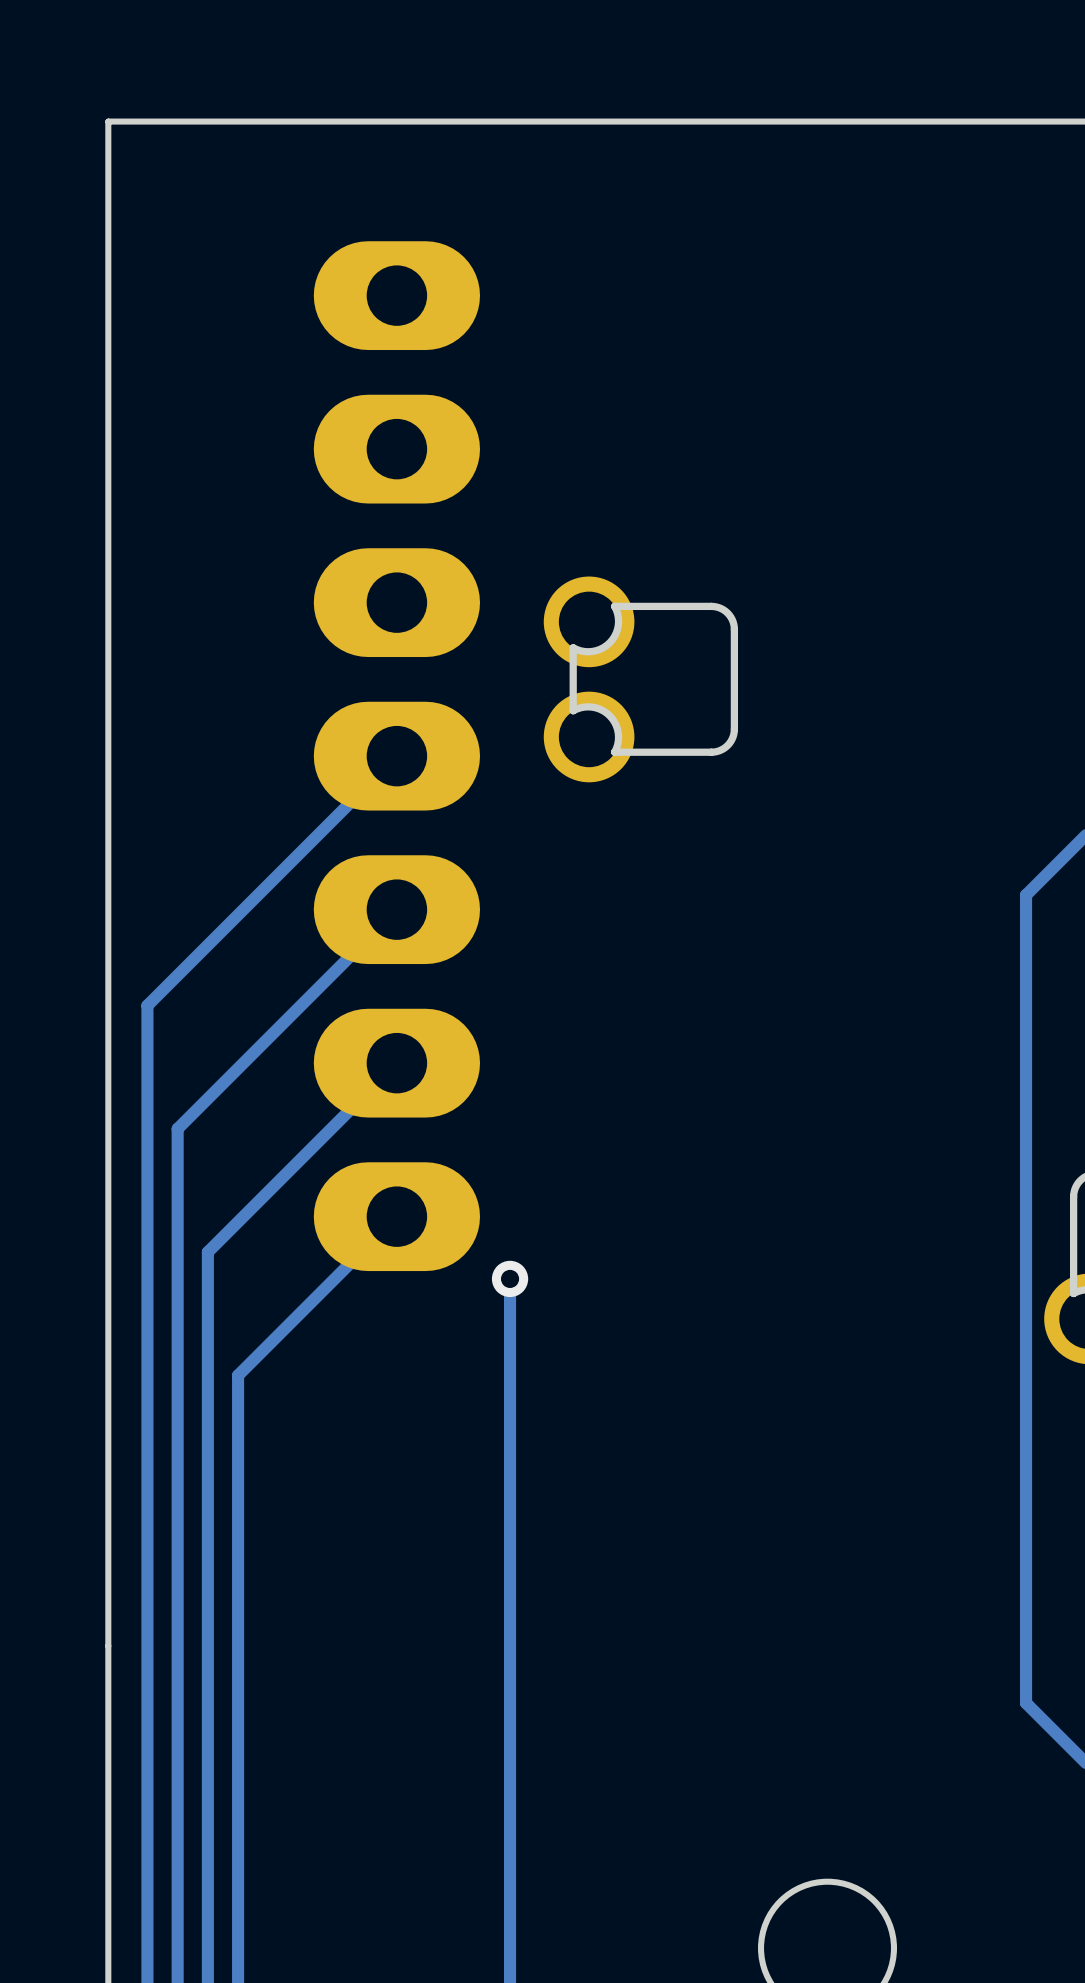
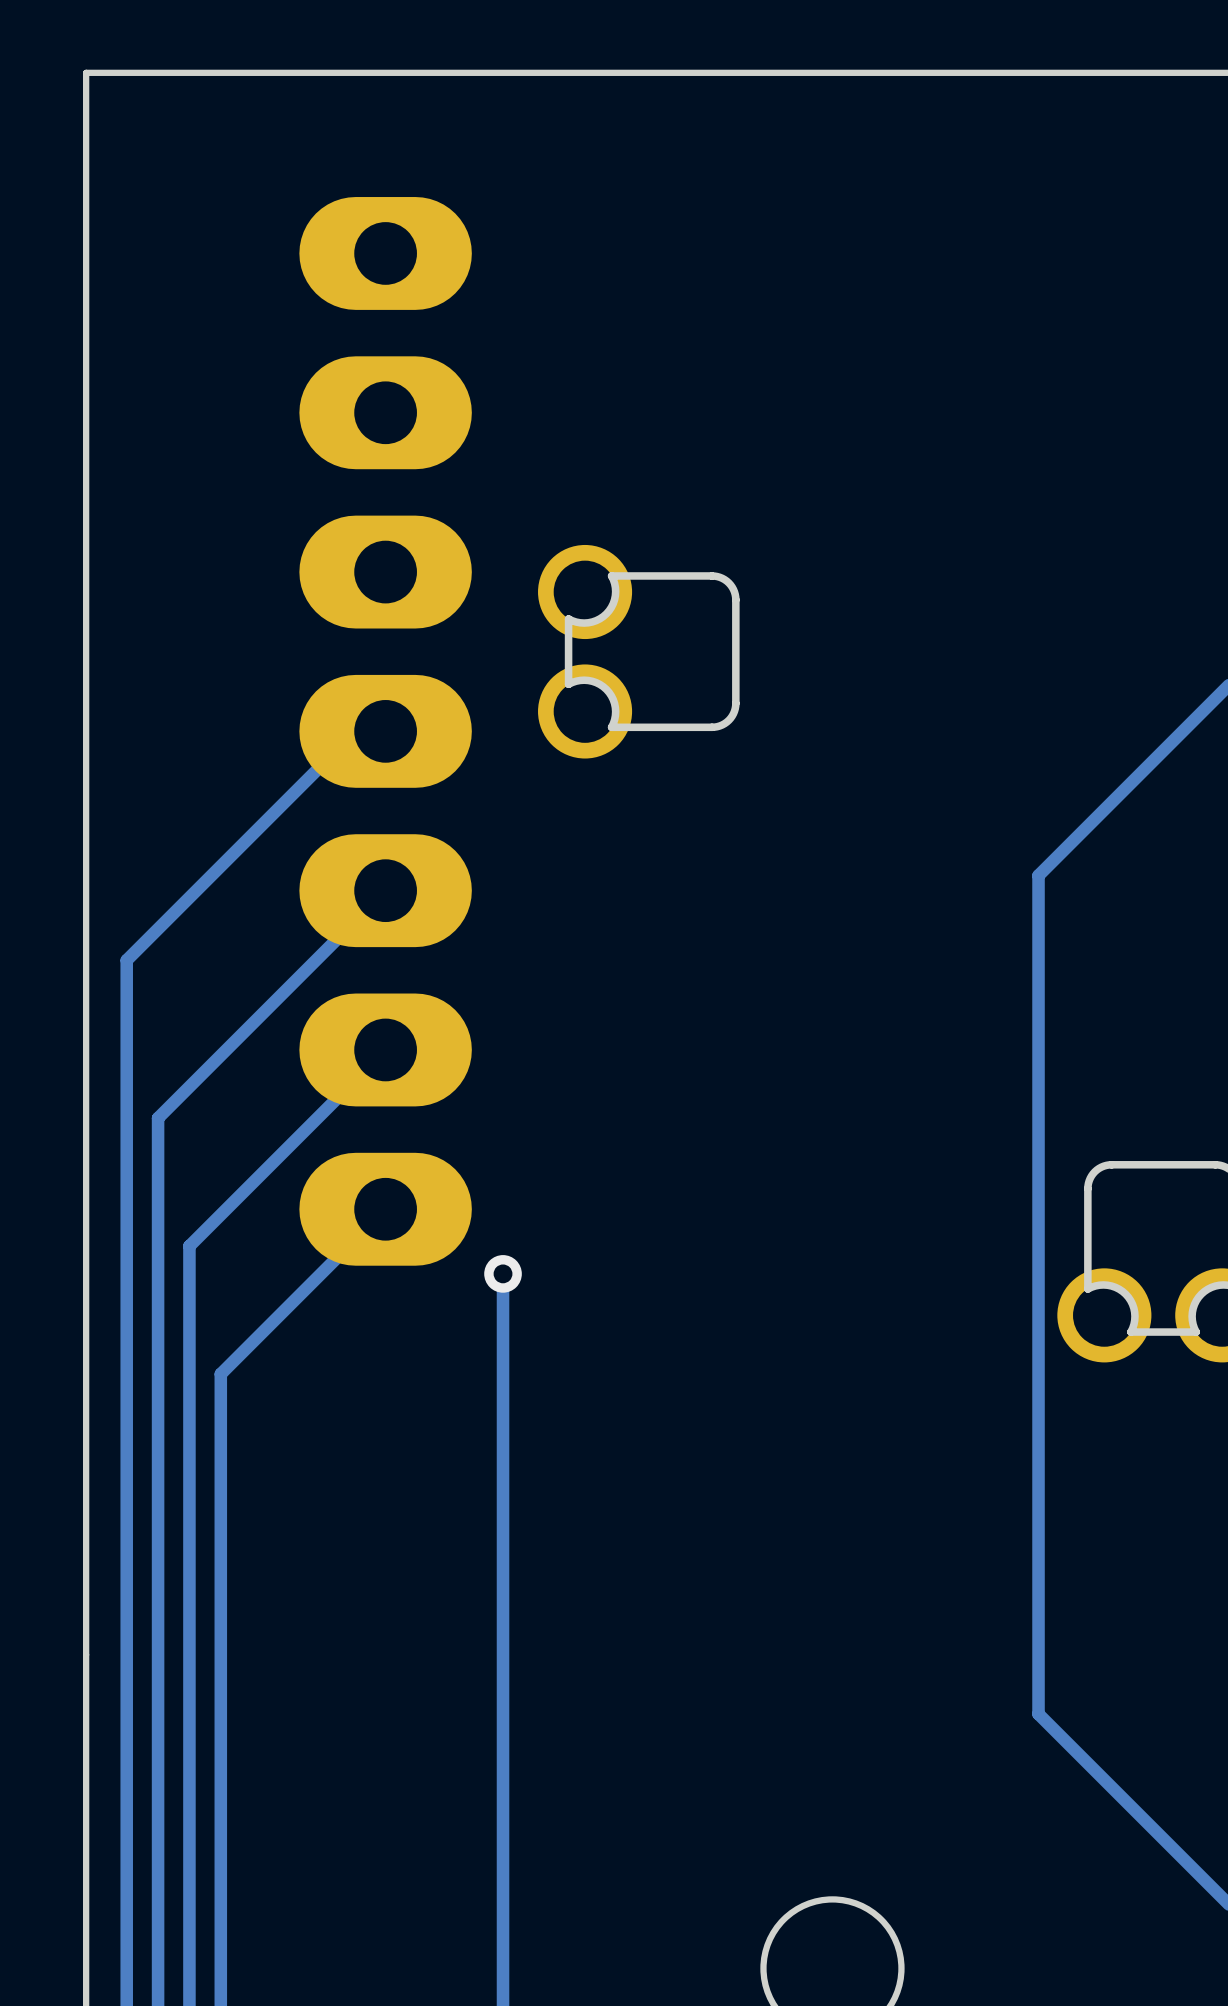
track: (396, 756) (147, 1005) -> (385, 731) (355, 731) (126, 960) (126, 990)

